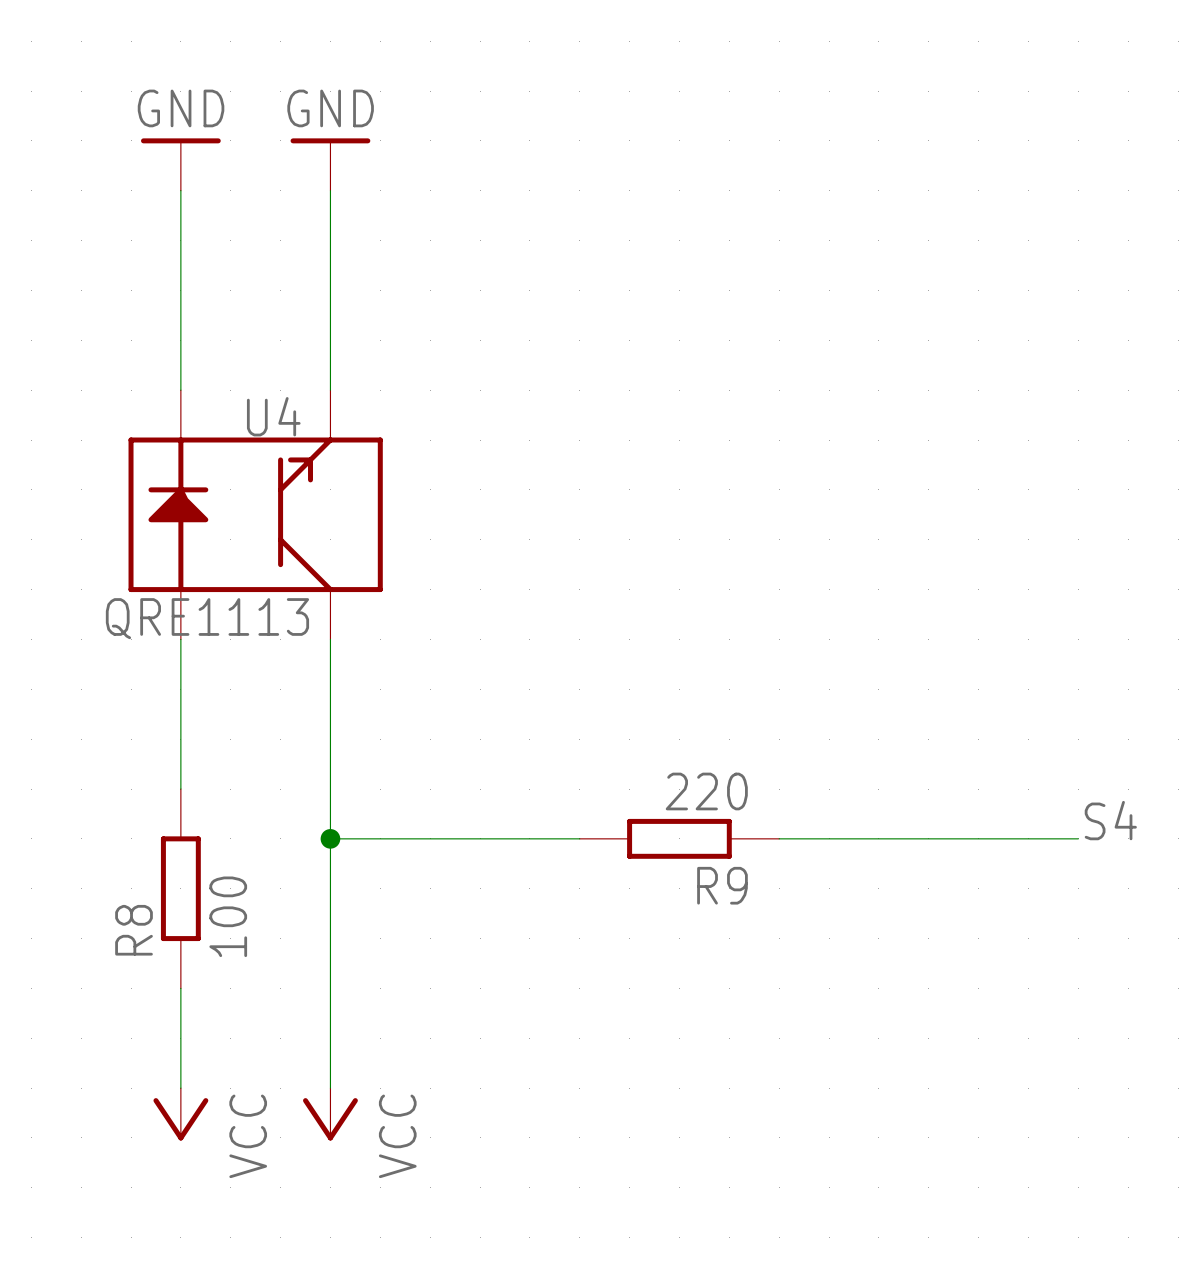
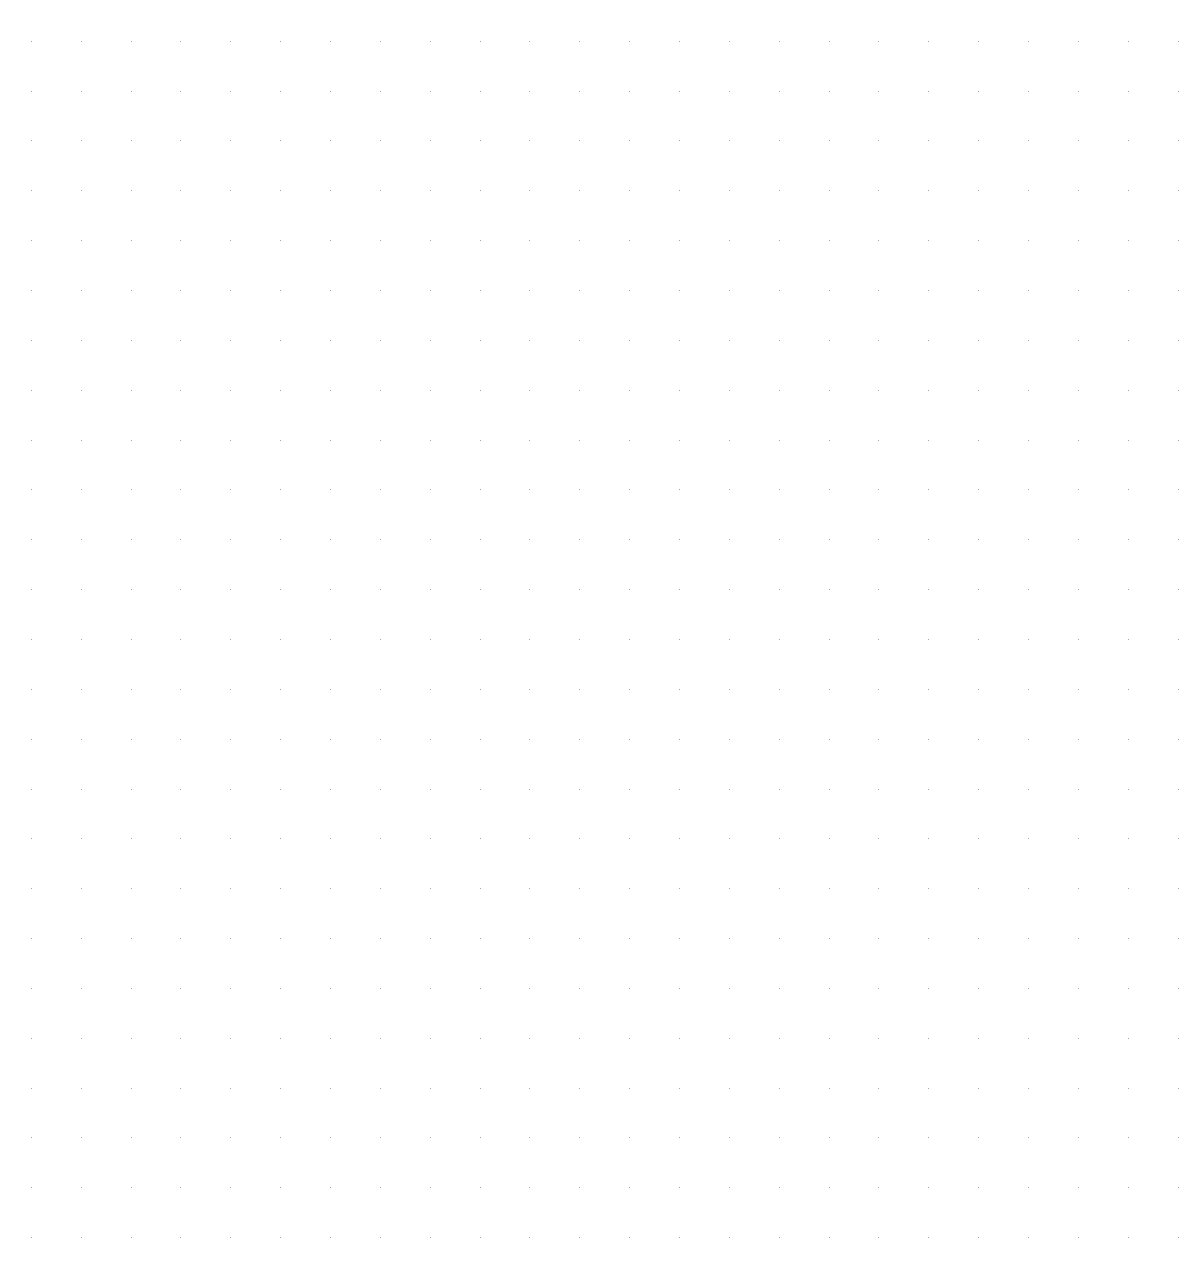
power symbol: GND (180, 164) -> none
power symbol: GND (330, 164) -> none
wire: (180, 190) (180, 390) -> none
wire: (330, 190) (330, 390) -> none
U4: QRE1113 (255, 514) -> none
wire: (180, 639) (180, 789) -> none
wire: (330, 639) (330, 1088) -> none
label: S4 (1110, 820) -> none
wire: (330, 838) (579, 838) -> none
junction: (330, 838) -> none
R9: 220 (679, 838) -> none
wire: (779, 838) (1078, 838) -> none
R8: 100 (180, 888) -> none
wire: (180, 988) (180, 1088) -> none
power symbol: VCC (180, 1114) -> none
power symbol: VCC (330, 1114) -> none

